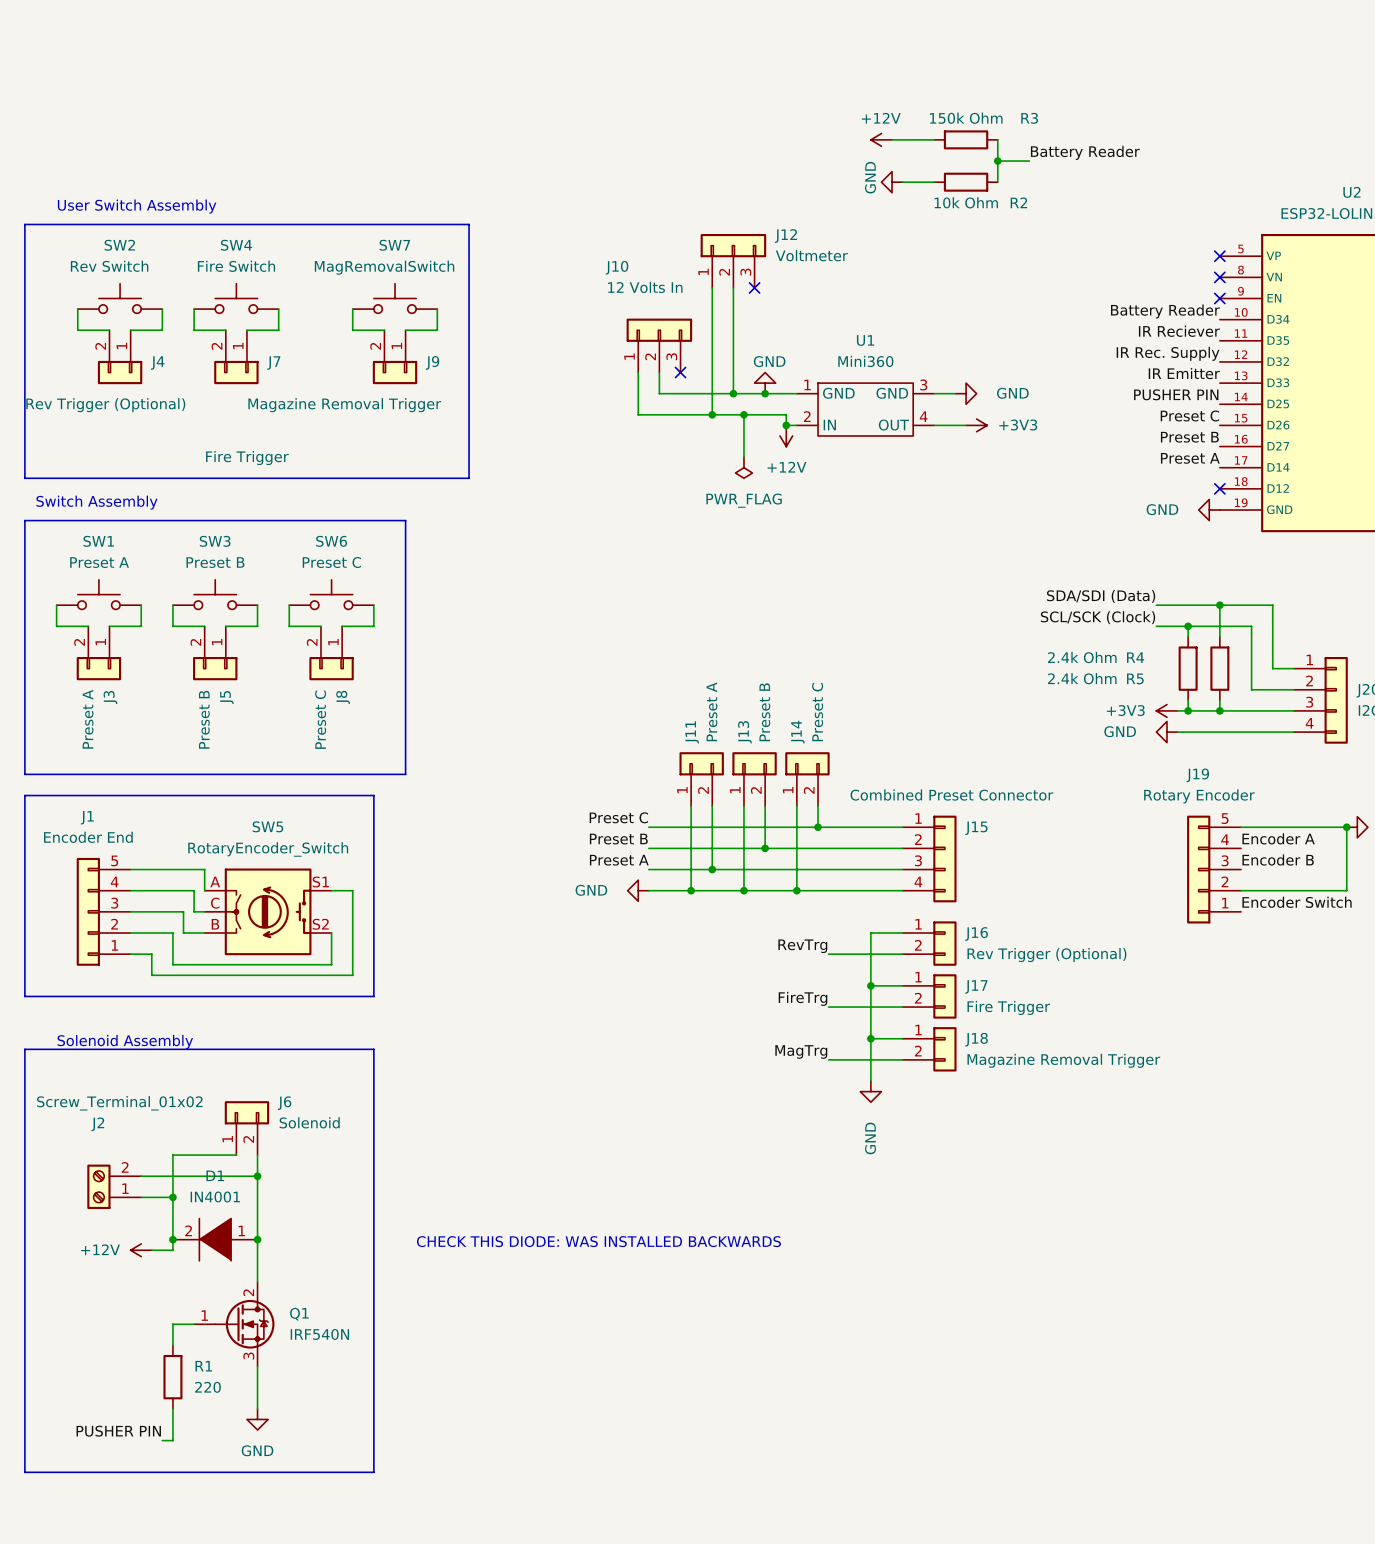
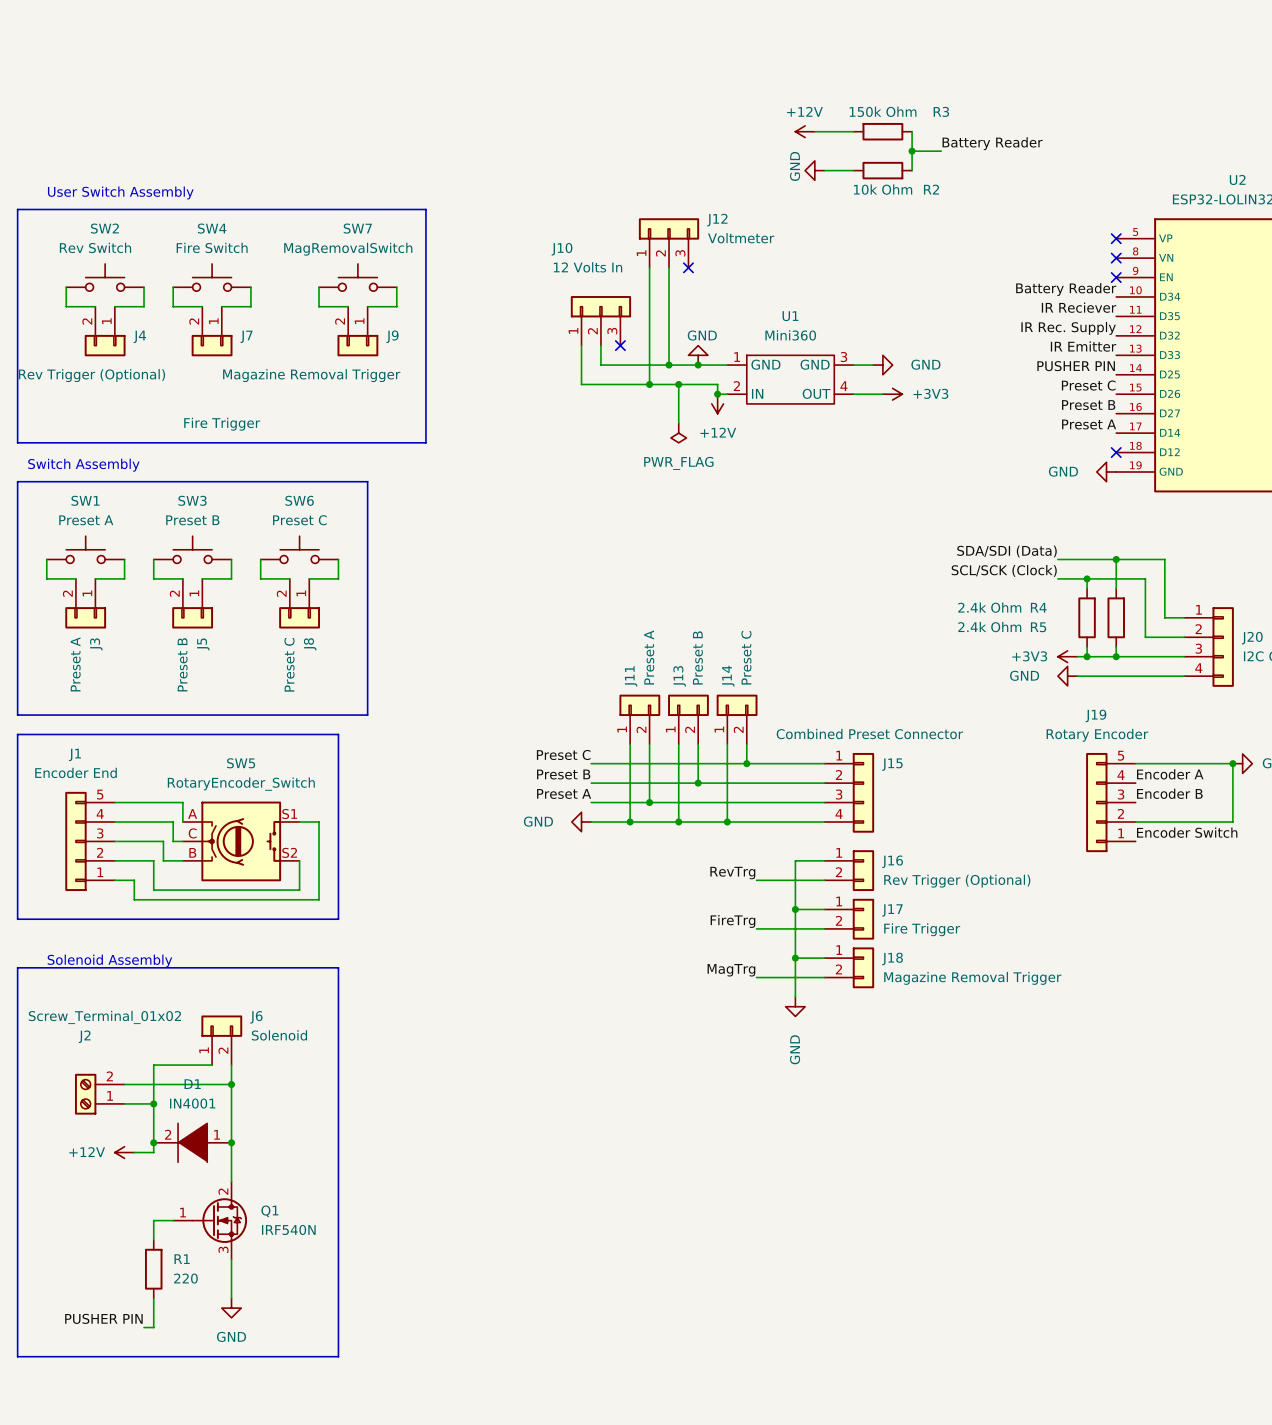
SW5 symbol: [204, 868, 332, 956] -> [182, 801, 300, 882]
text: CHECK THIS DIODE: WAS INSTALLED BACKWARDS (598, 1241) -> none

